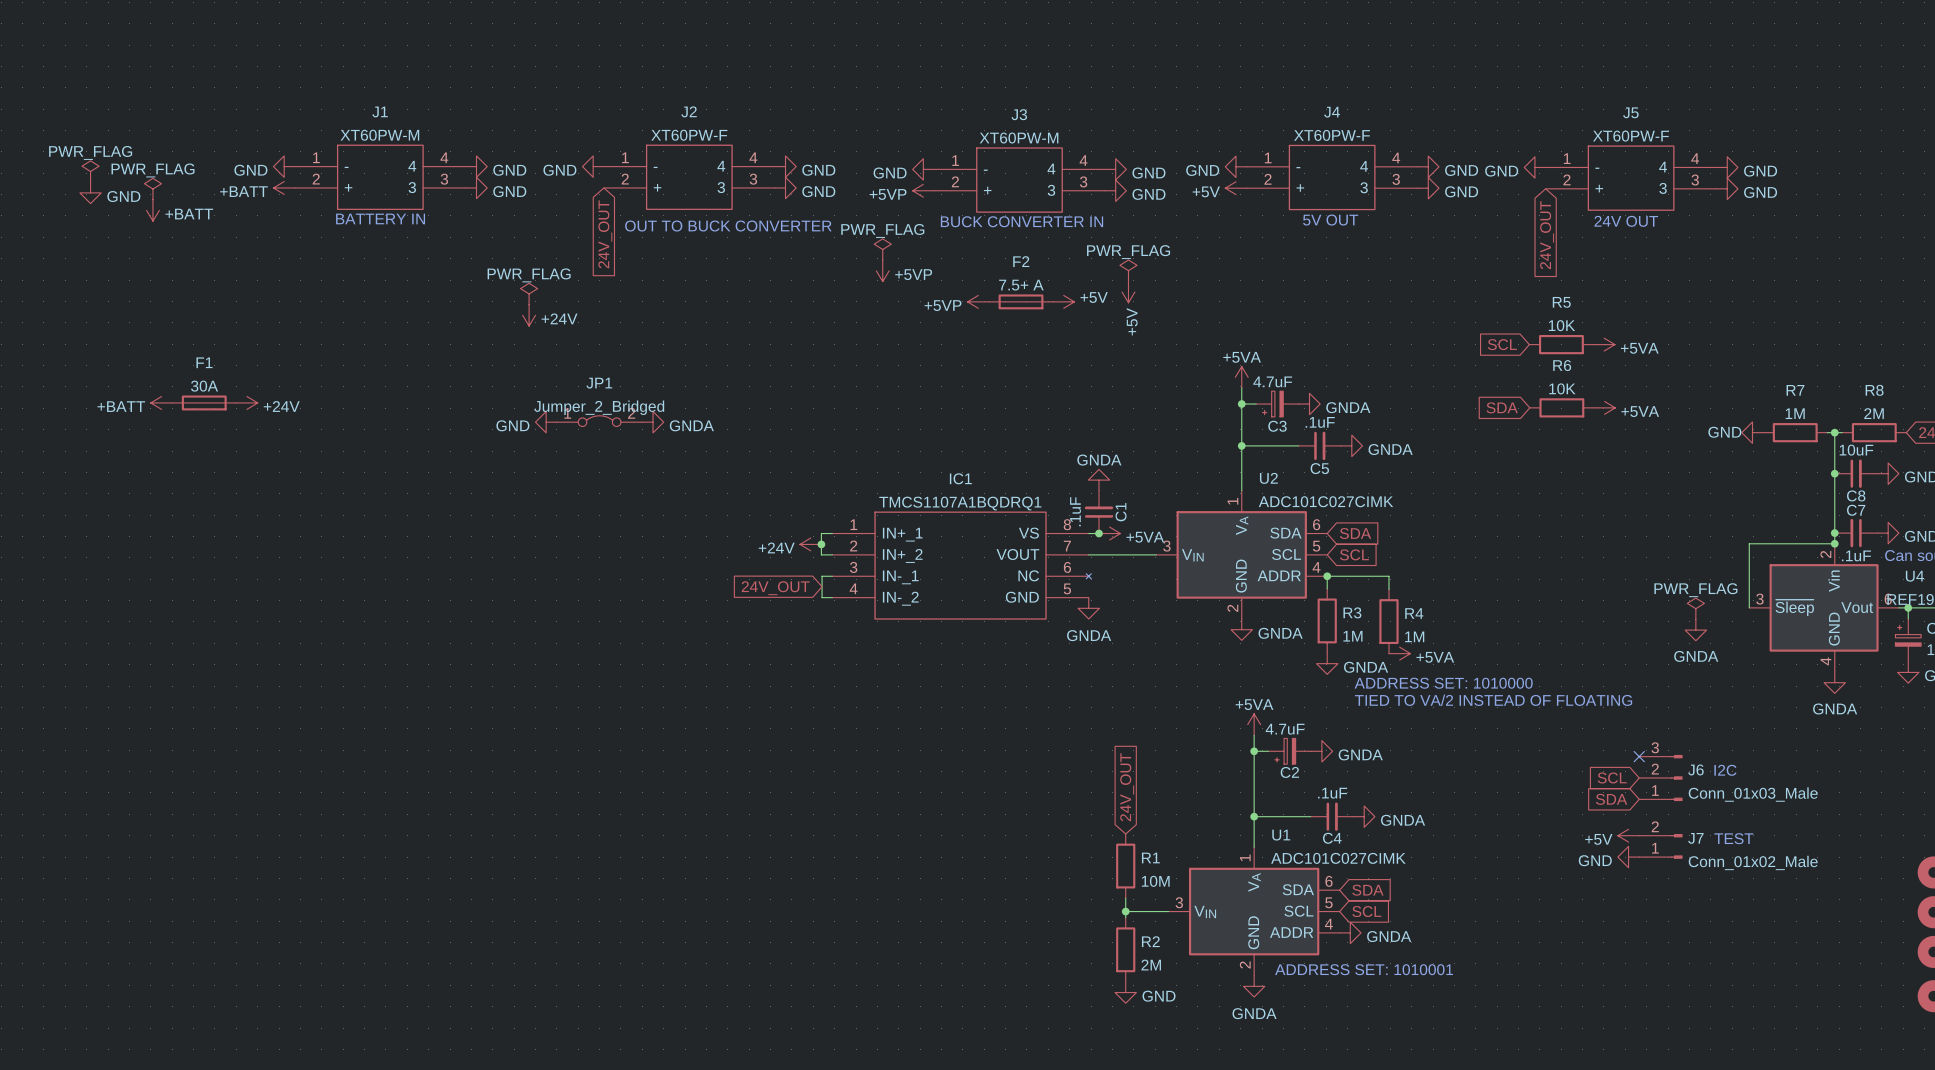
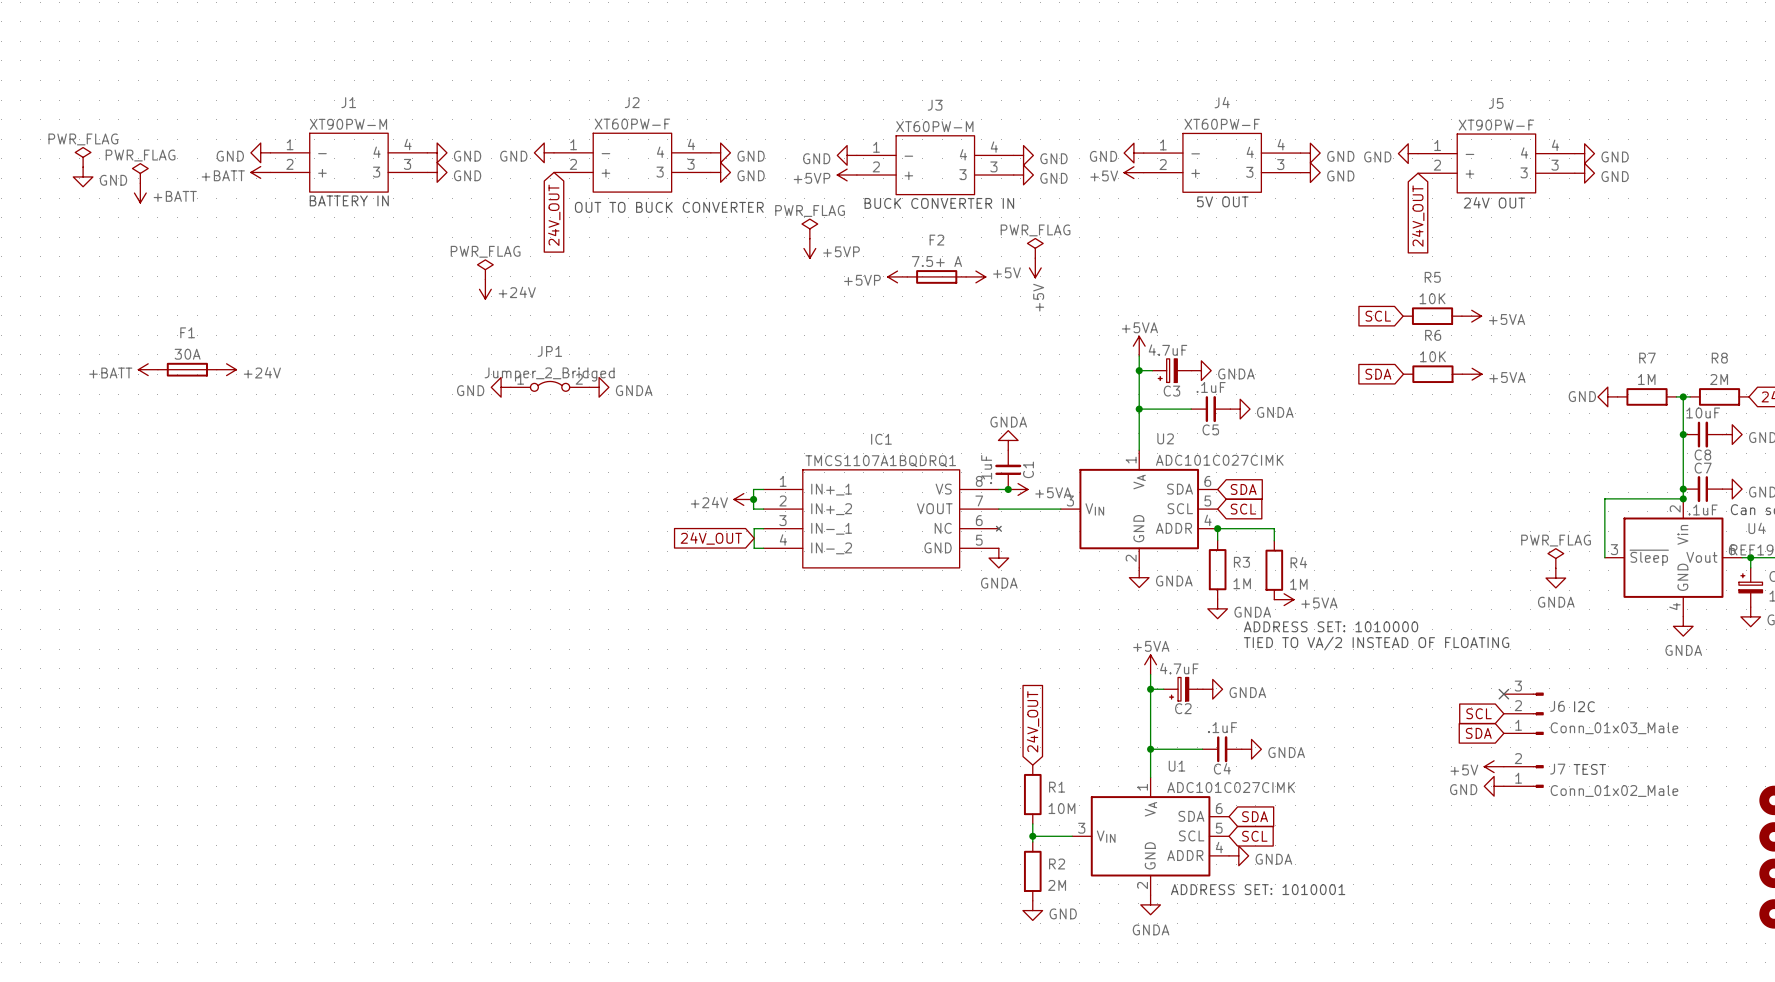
J1 value: XT60PW-M (379, 135) -> XT90PW-M (348, 124)
J5 value: XT60PW-F (1630, 136) -> XT90PW-F (1496, 125)

